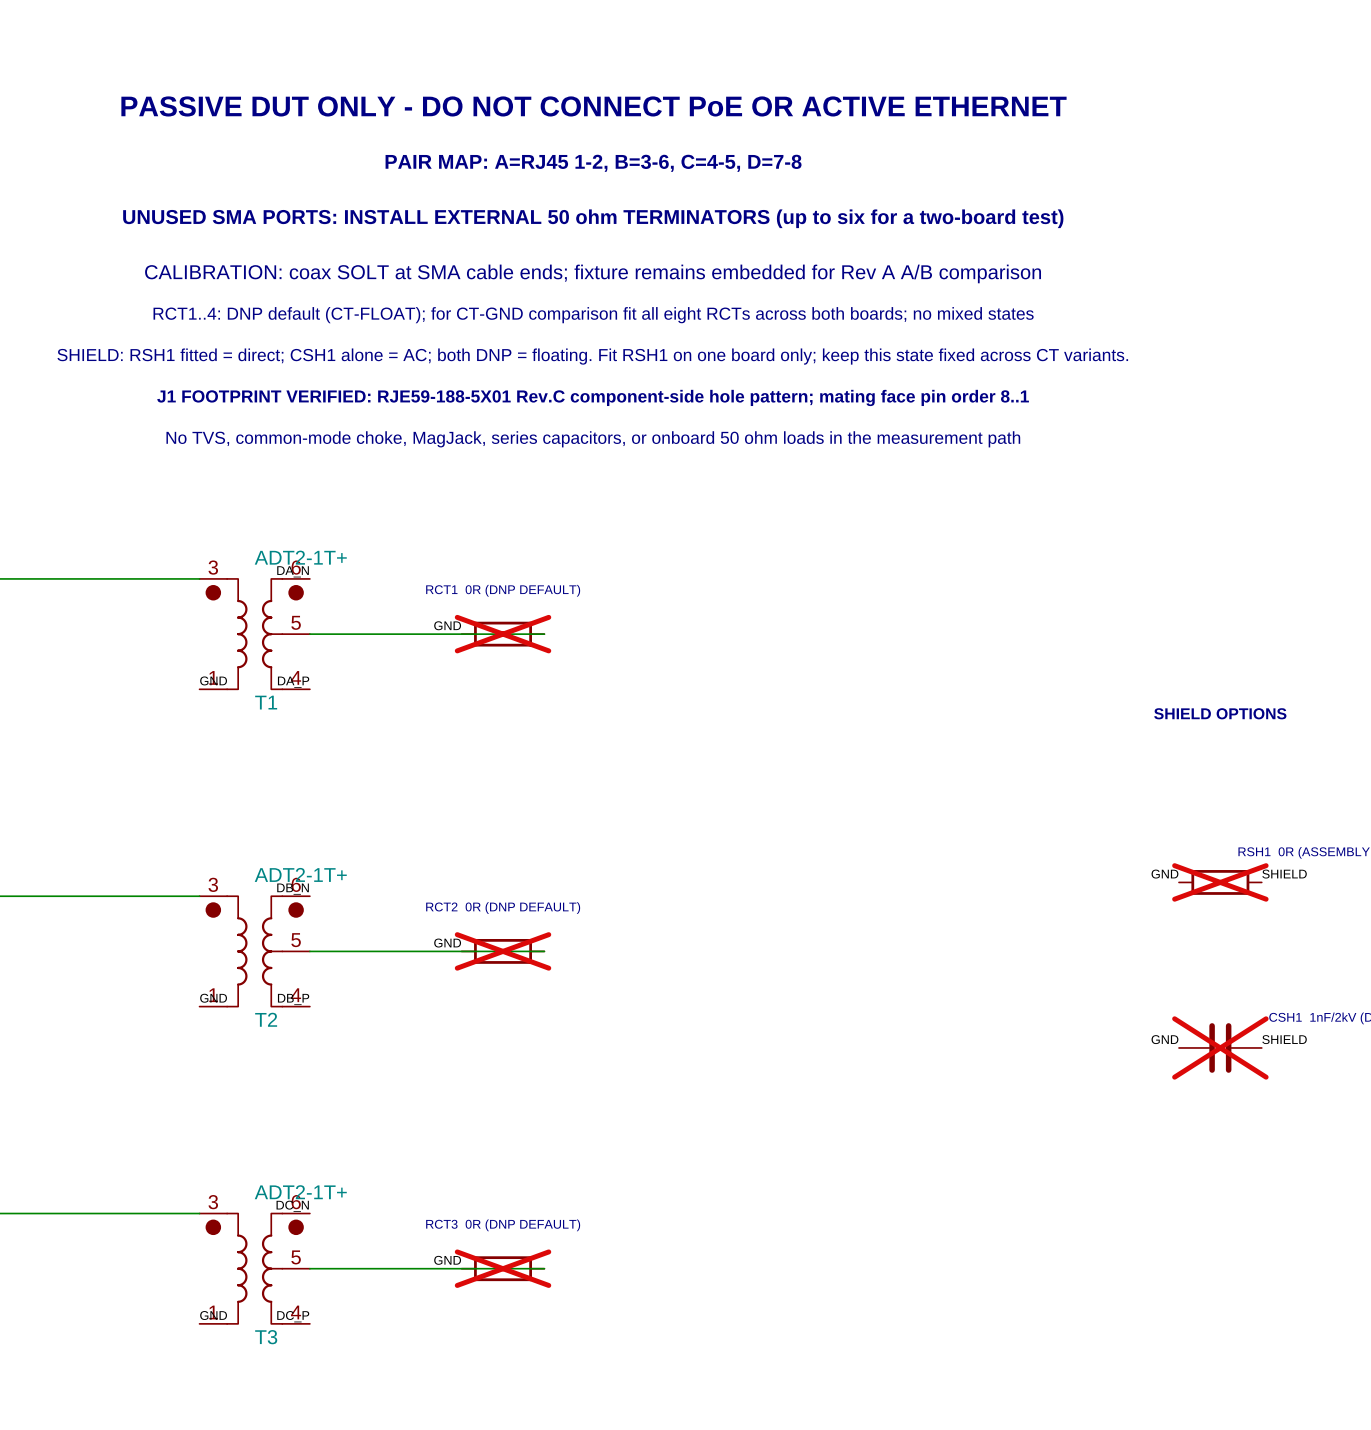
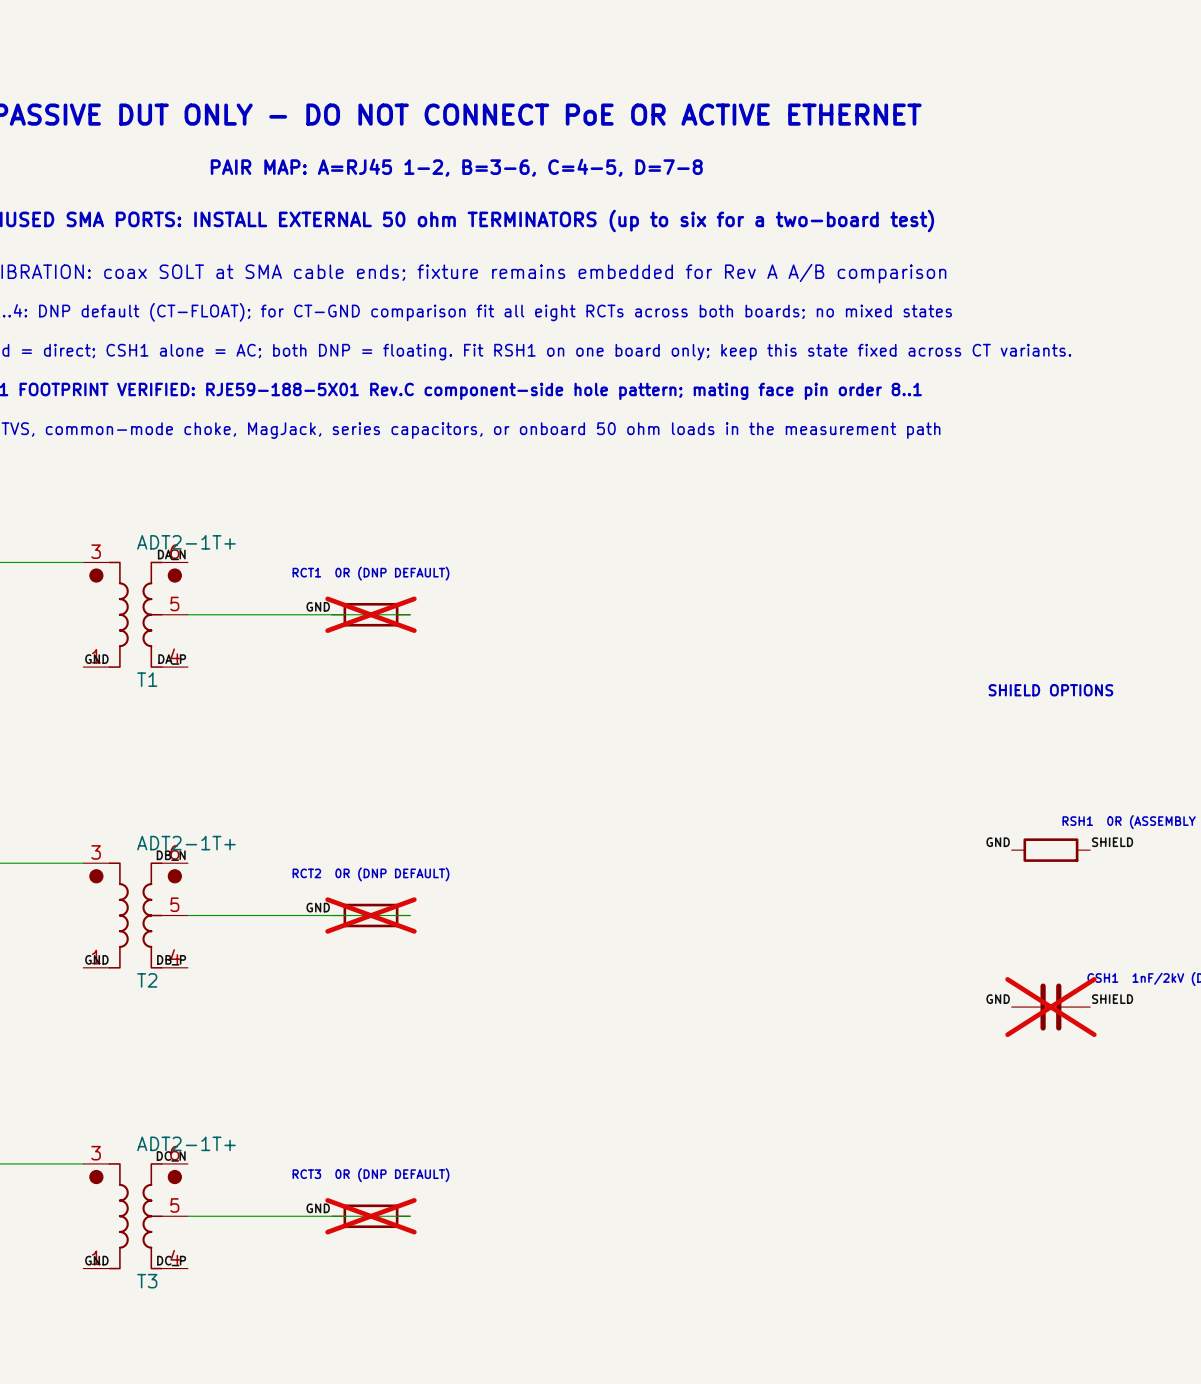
part do-not-place cross: (1220, 882) -> none

